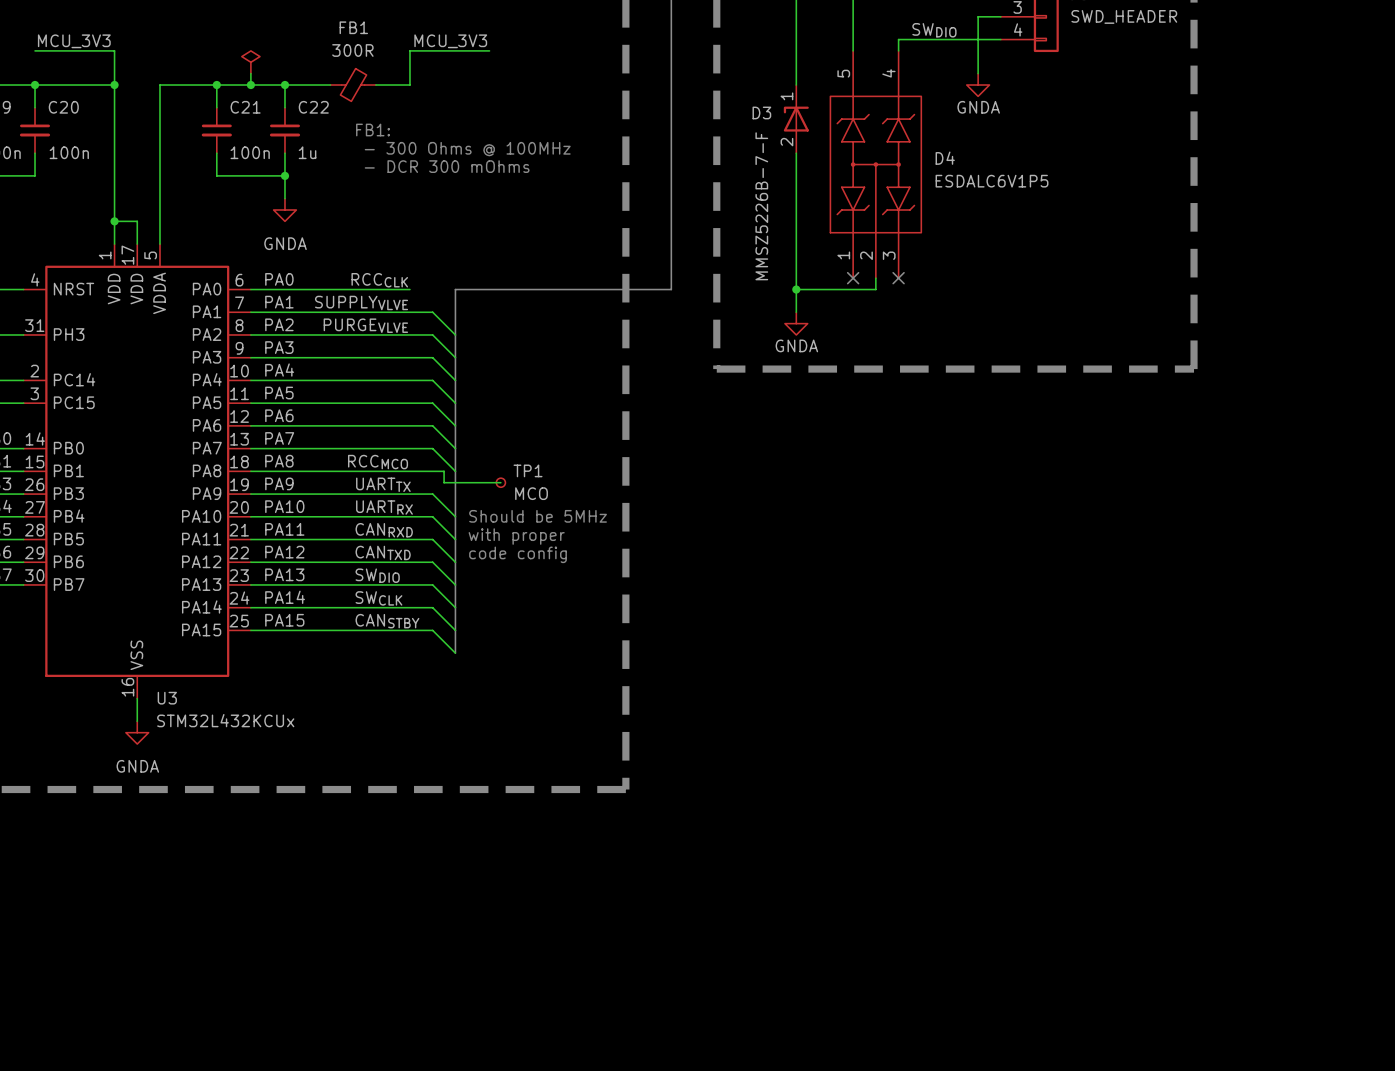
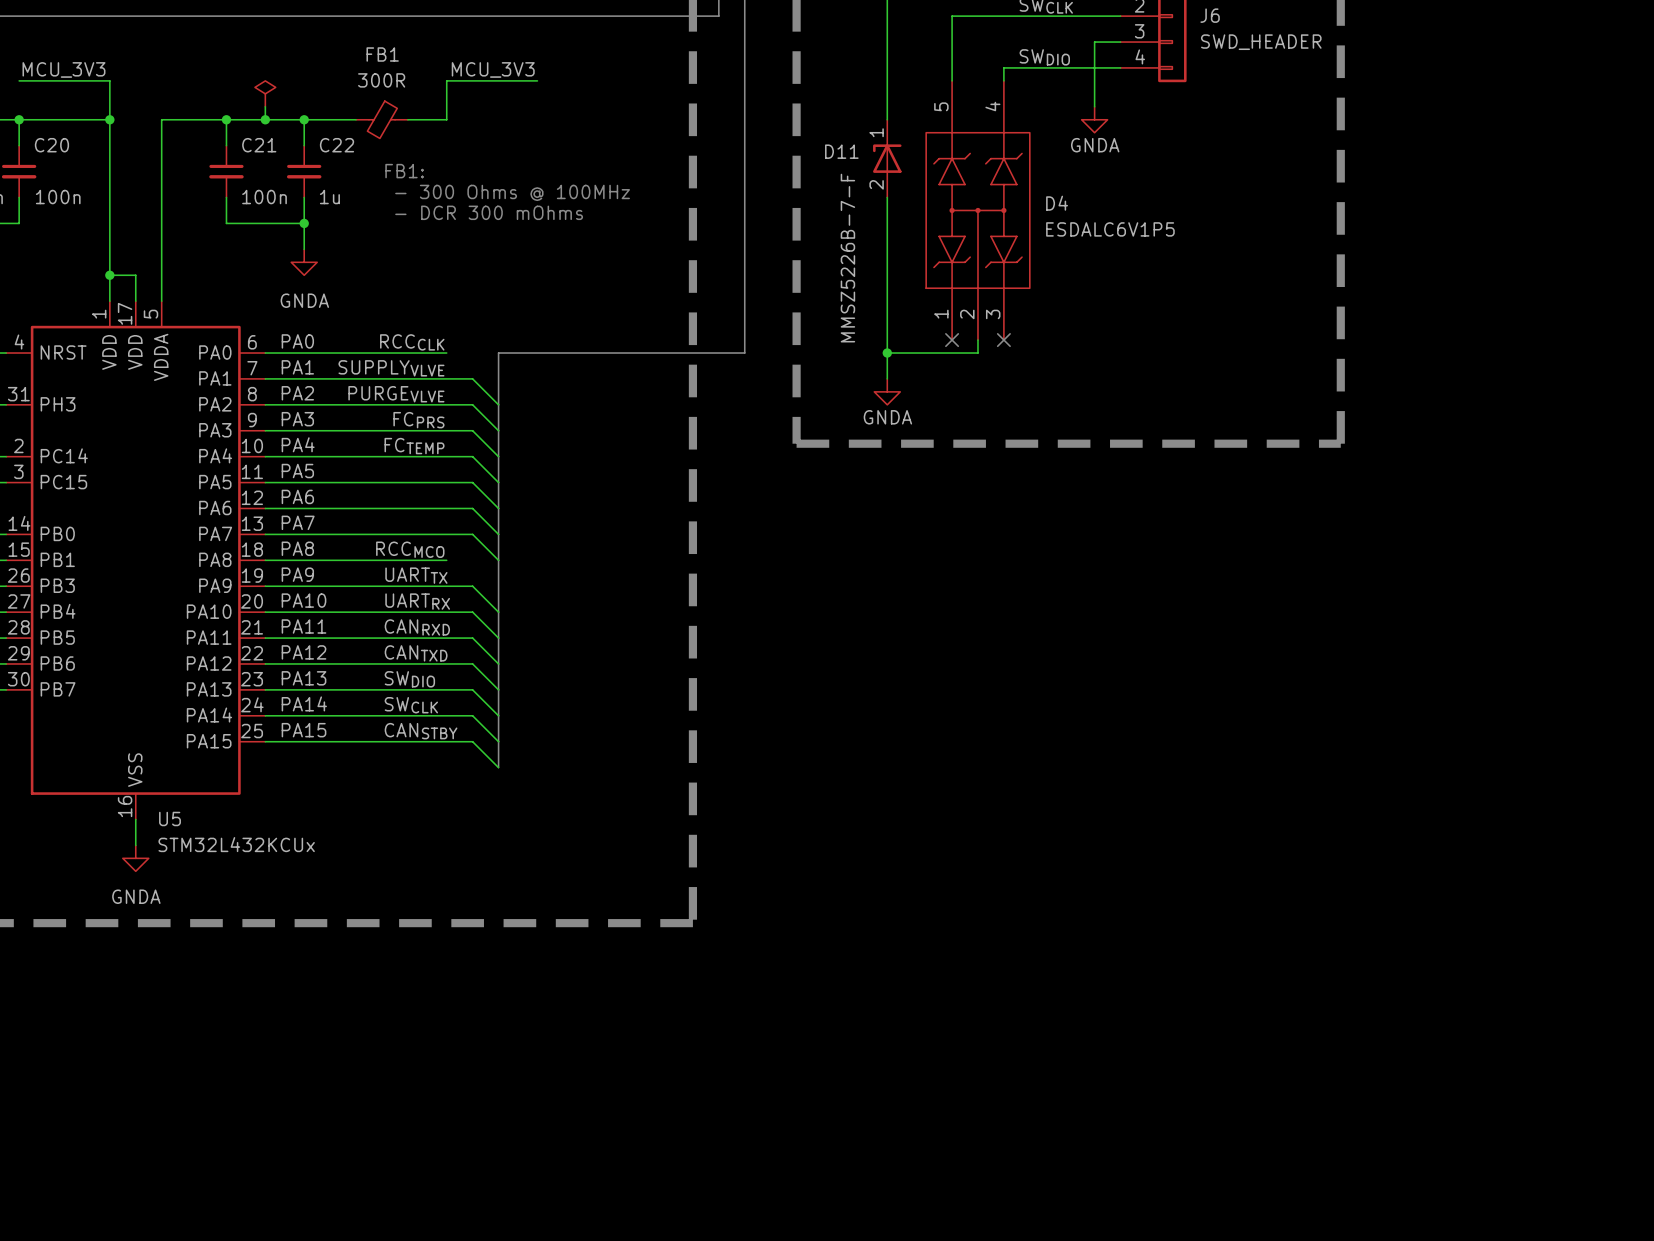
D3 name: D3 (761, 112) -> D11 (841, 151)
label: none -> FCPRS (418, 420)
label: none -> FCTEMP (414, 446)
wire: (409, 471) (444, 471) (444, 482) (500, 482) -> none
TP1: MCO (500, 482) -> none
text: Should be 5MHz (538, 516) -> none
text: with proper (516, 536) -> none
text: code config (518, 554) -> none
U3 name: U3 (167, 698) -> U5 (170, 818)

